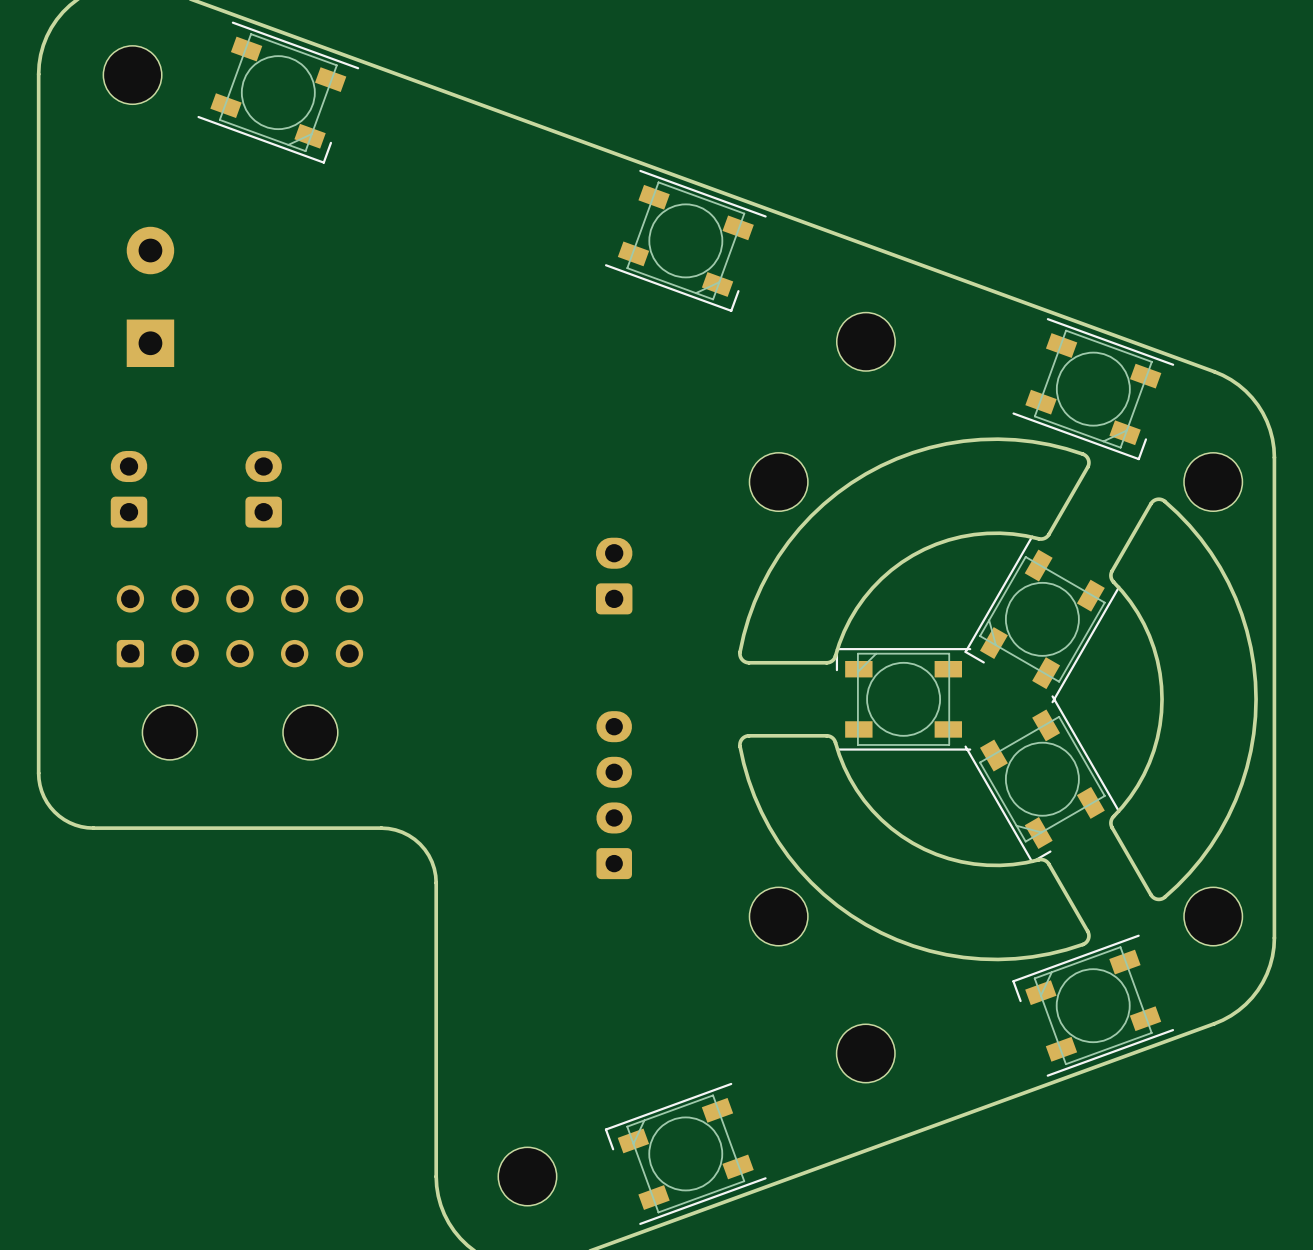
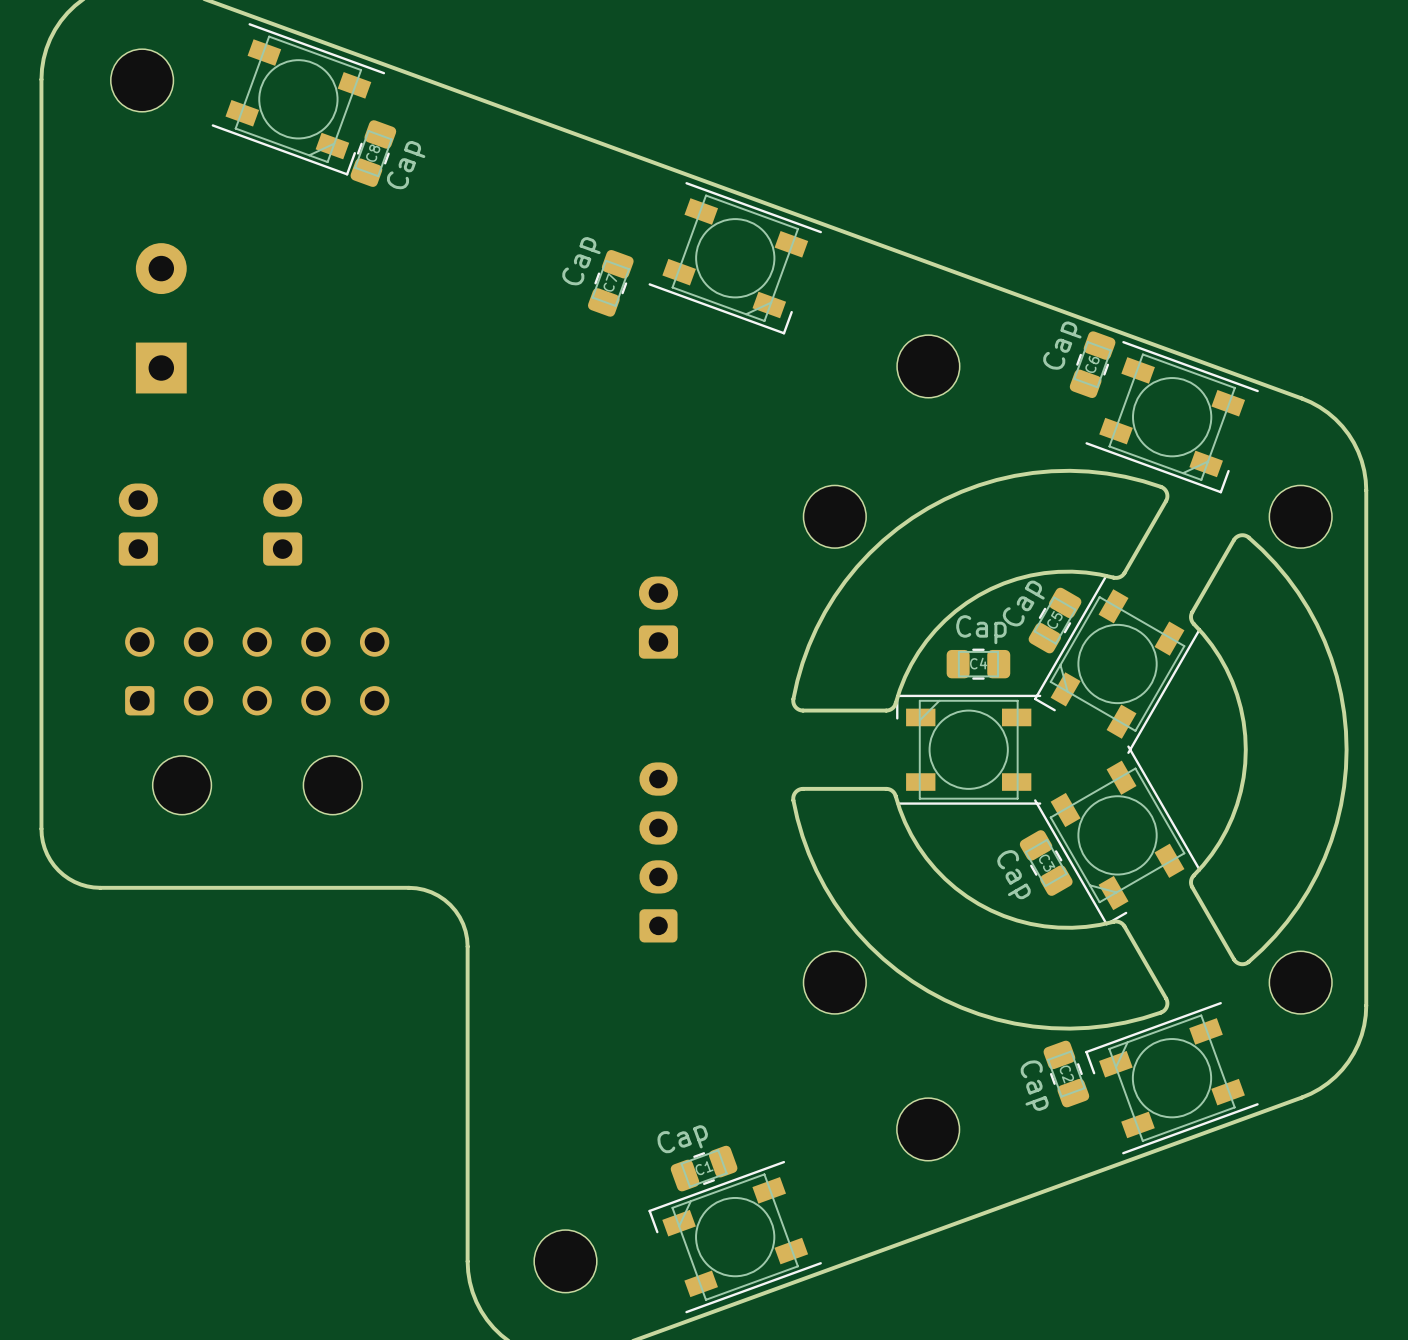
C8: none -> Cap (373, 153)
C7: none -> Cap (610, 283)
C6: none -> Cap (1092, 364)
C5: none -> Cap (1055, 620)
C4: none -> Cap (978, 664)
C3: none -> Cap (1046, 863)
C2: none -> Cap (1066, 1074)
C1: none -> Cap (704, 1168)

